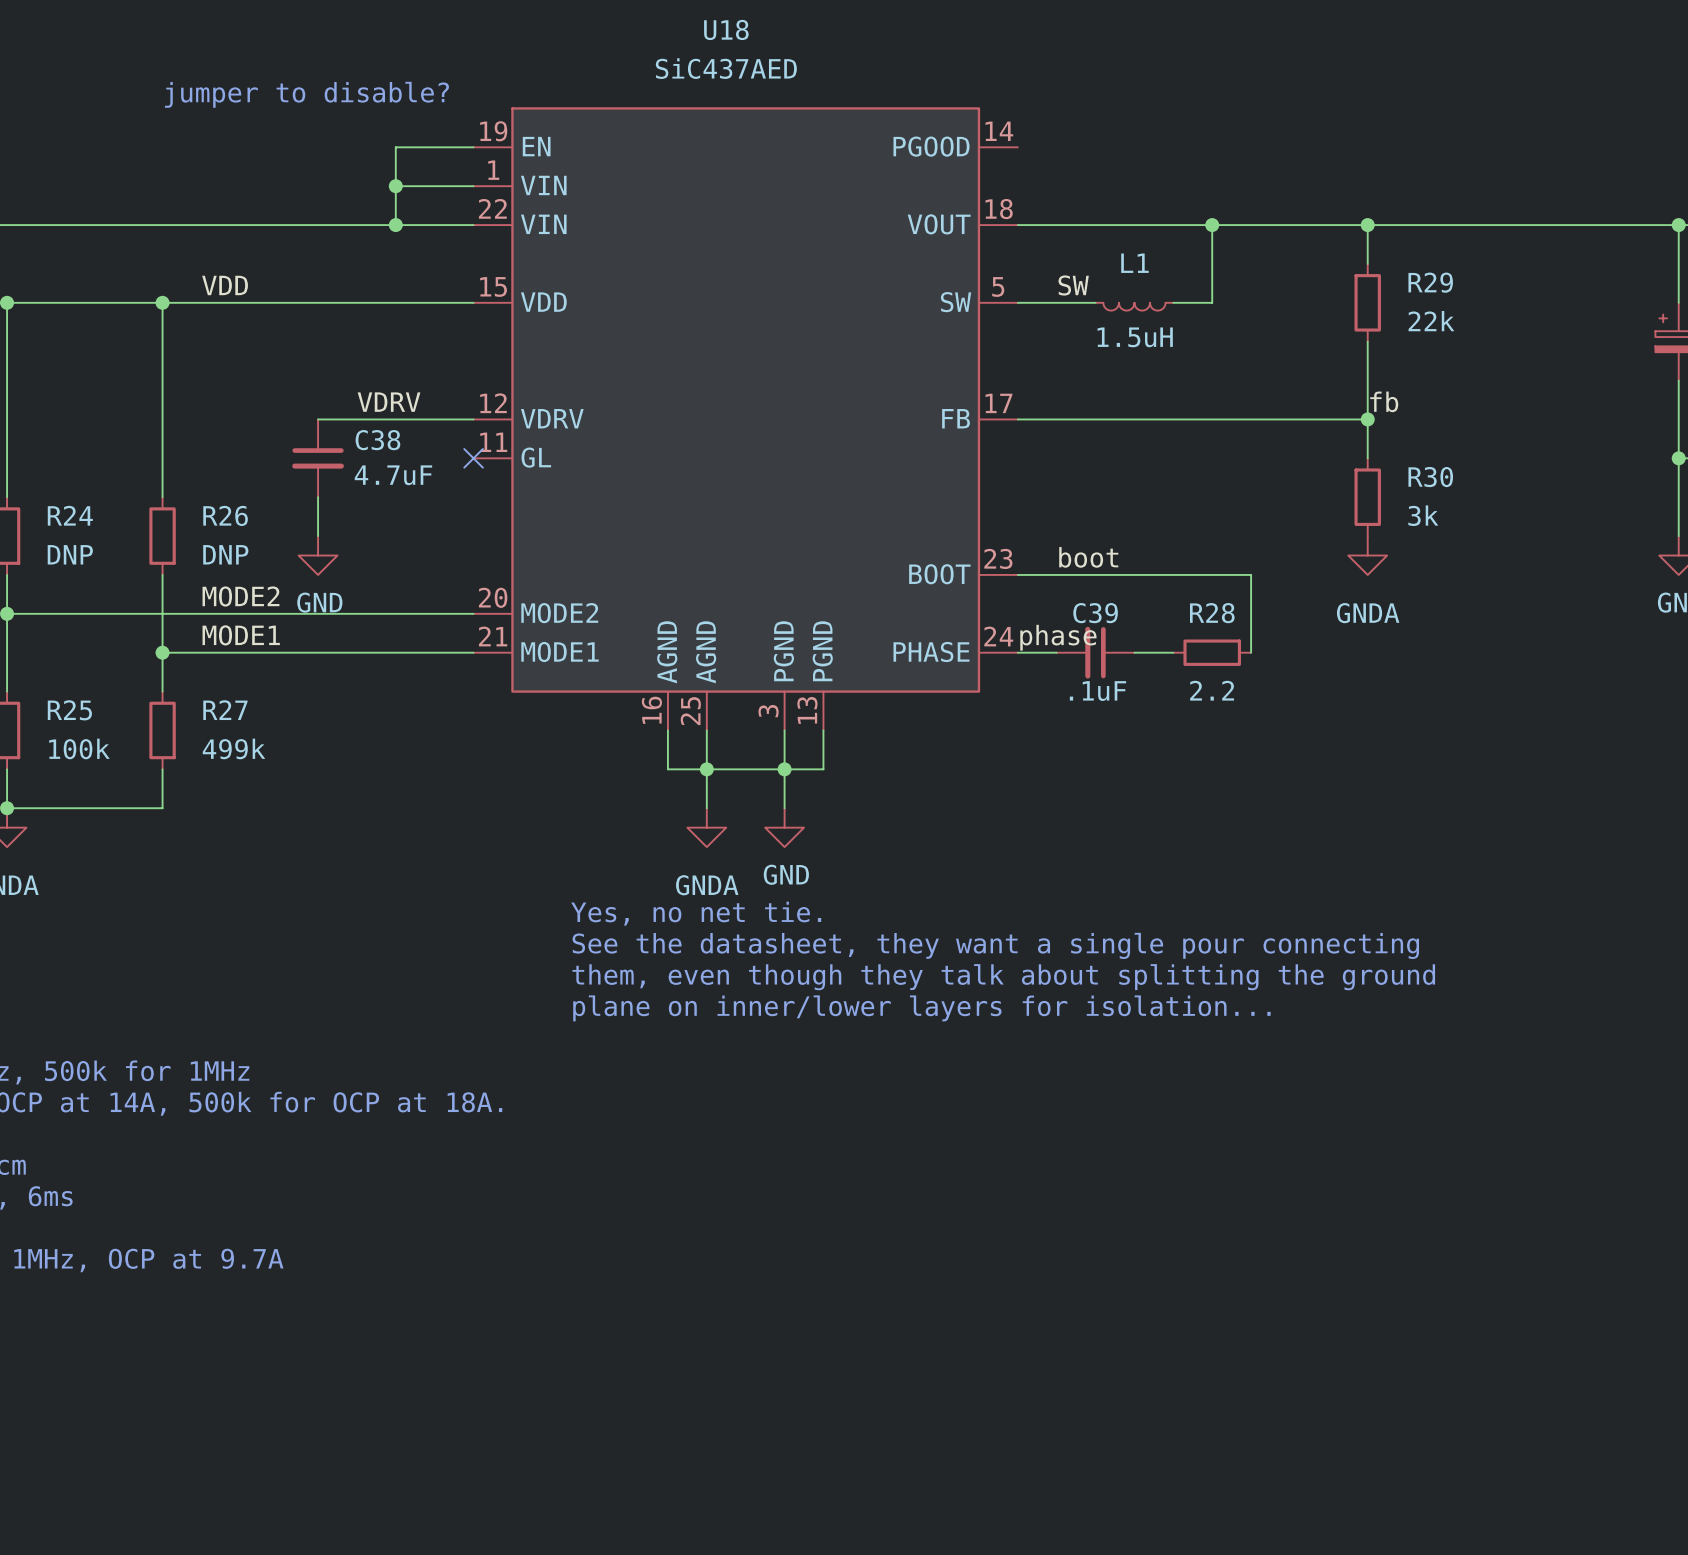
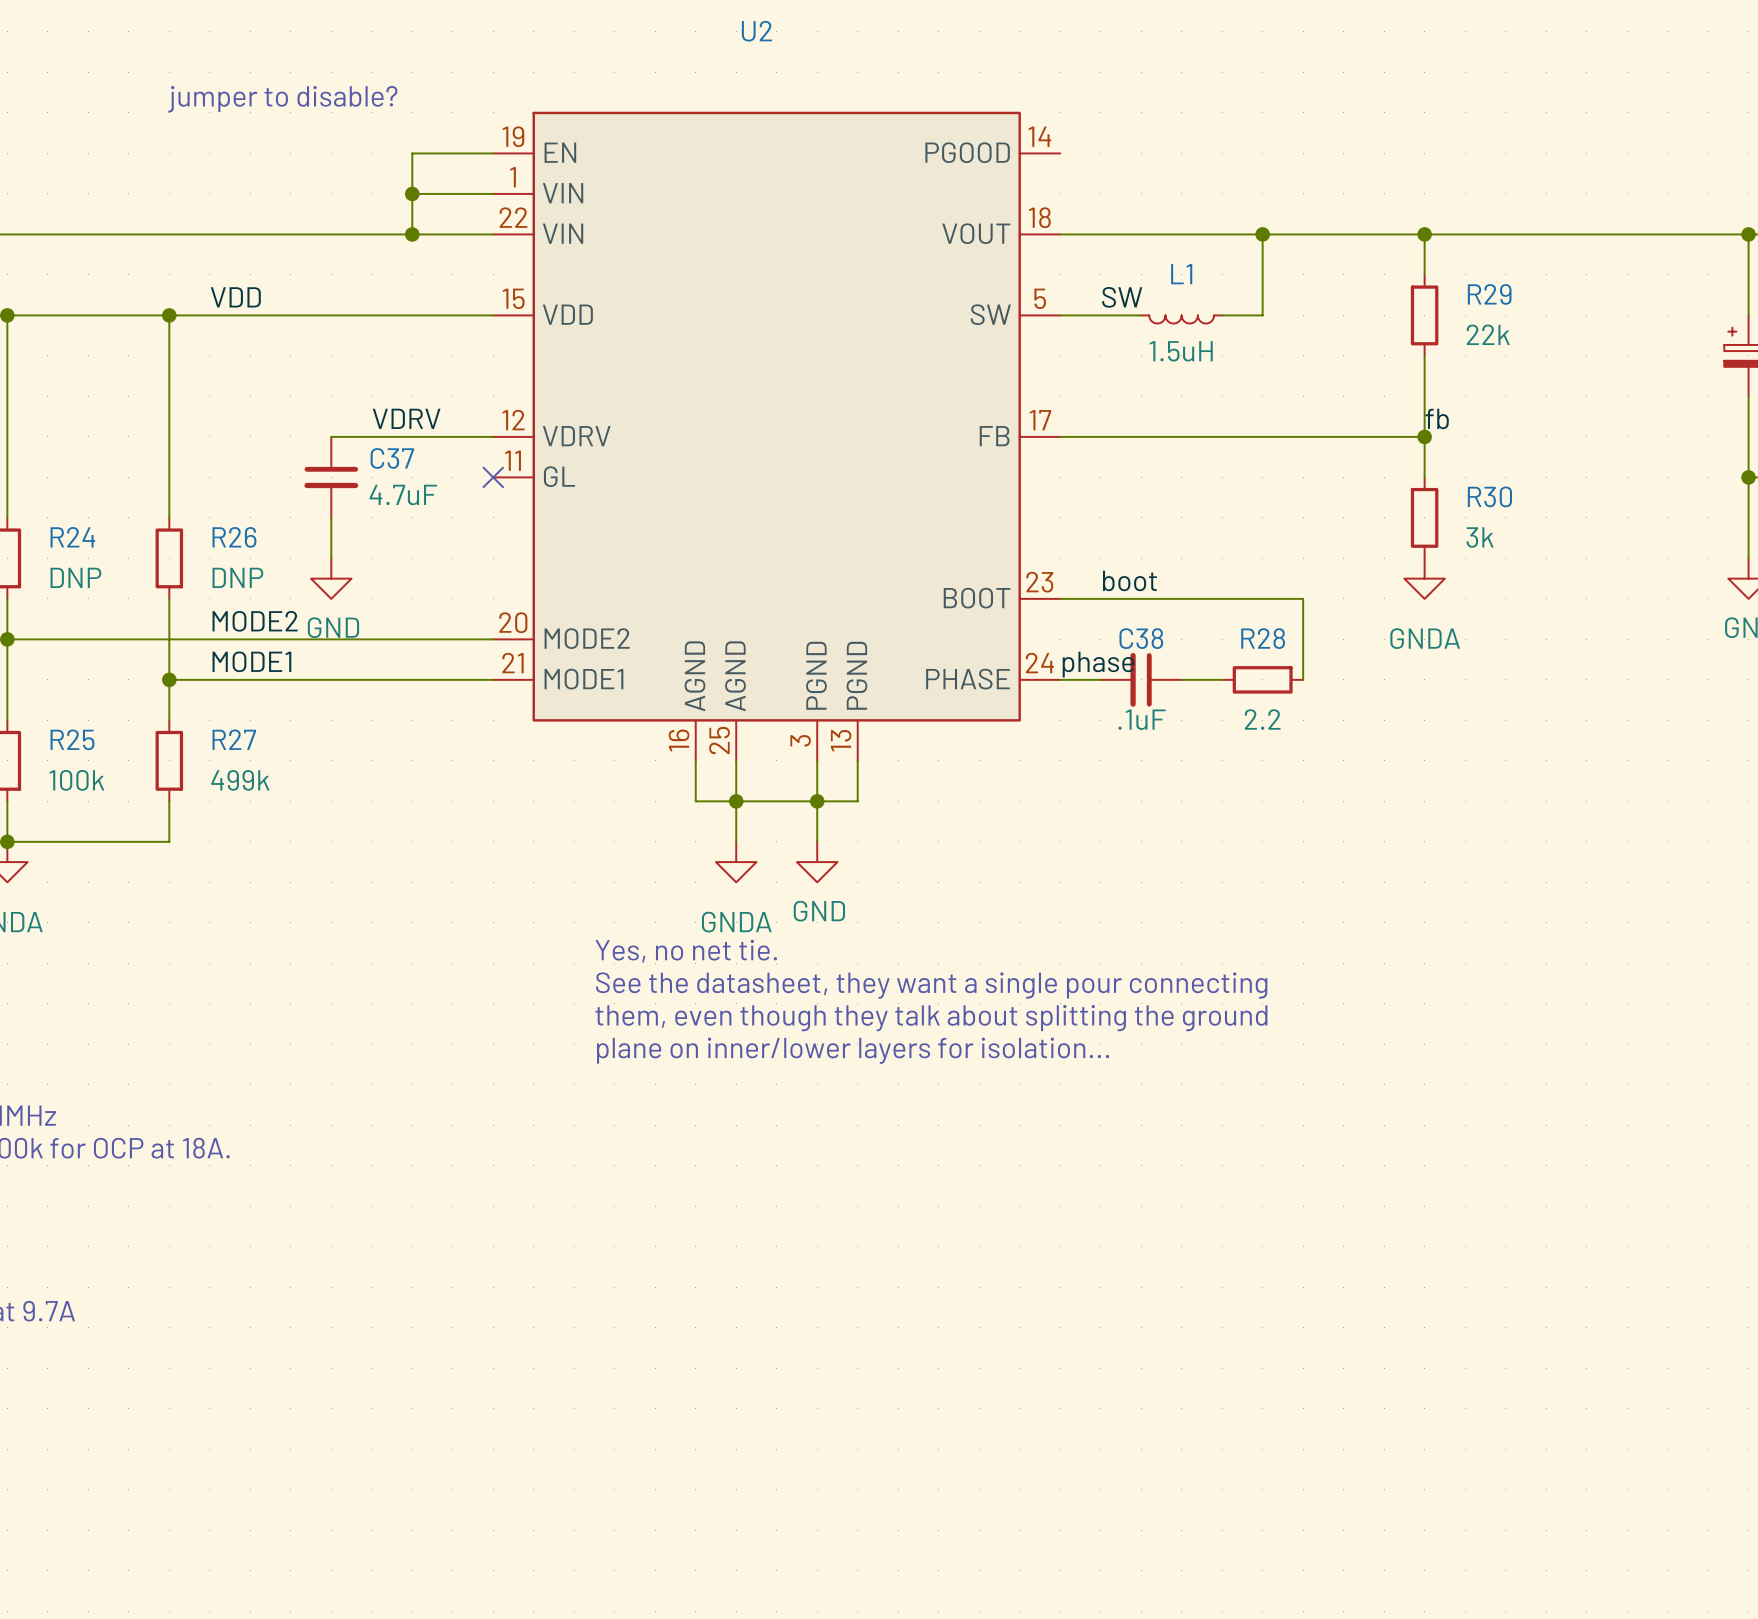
U18 name: U18 (726, 29) -> U2 (756, 31)
U18 value: SiC437AED (726, 68) -> none
C38 name: C38 (377, 440) -> C37 (392, 458)
C39 name: C39 (1095, 613) -> C38 (1141, 638)

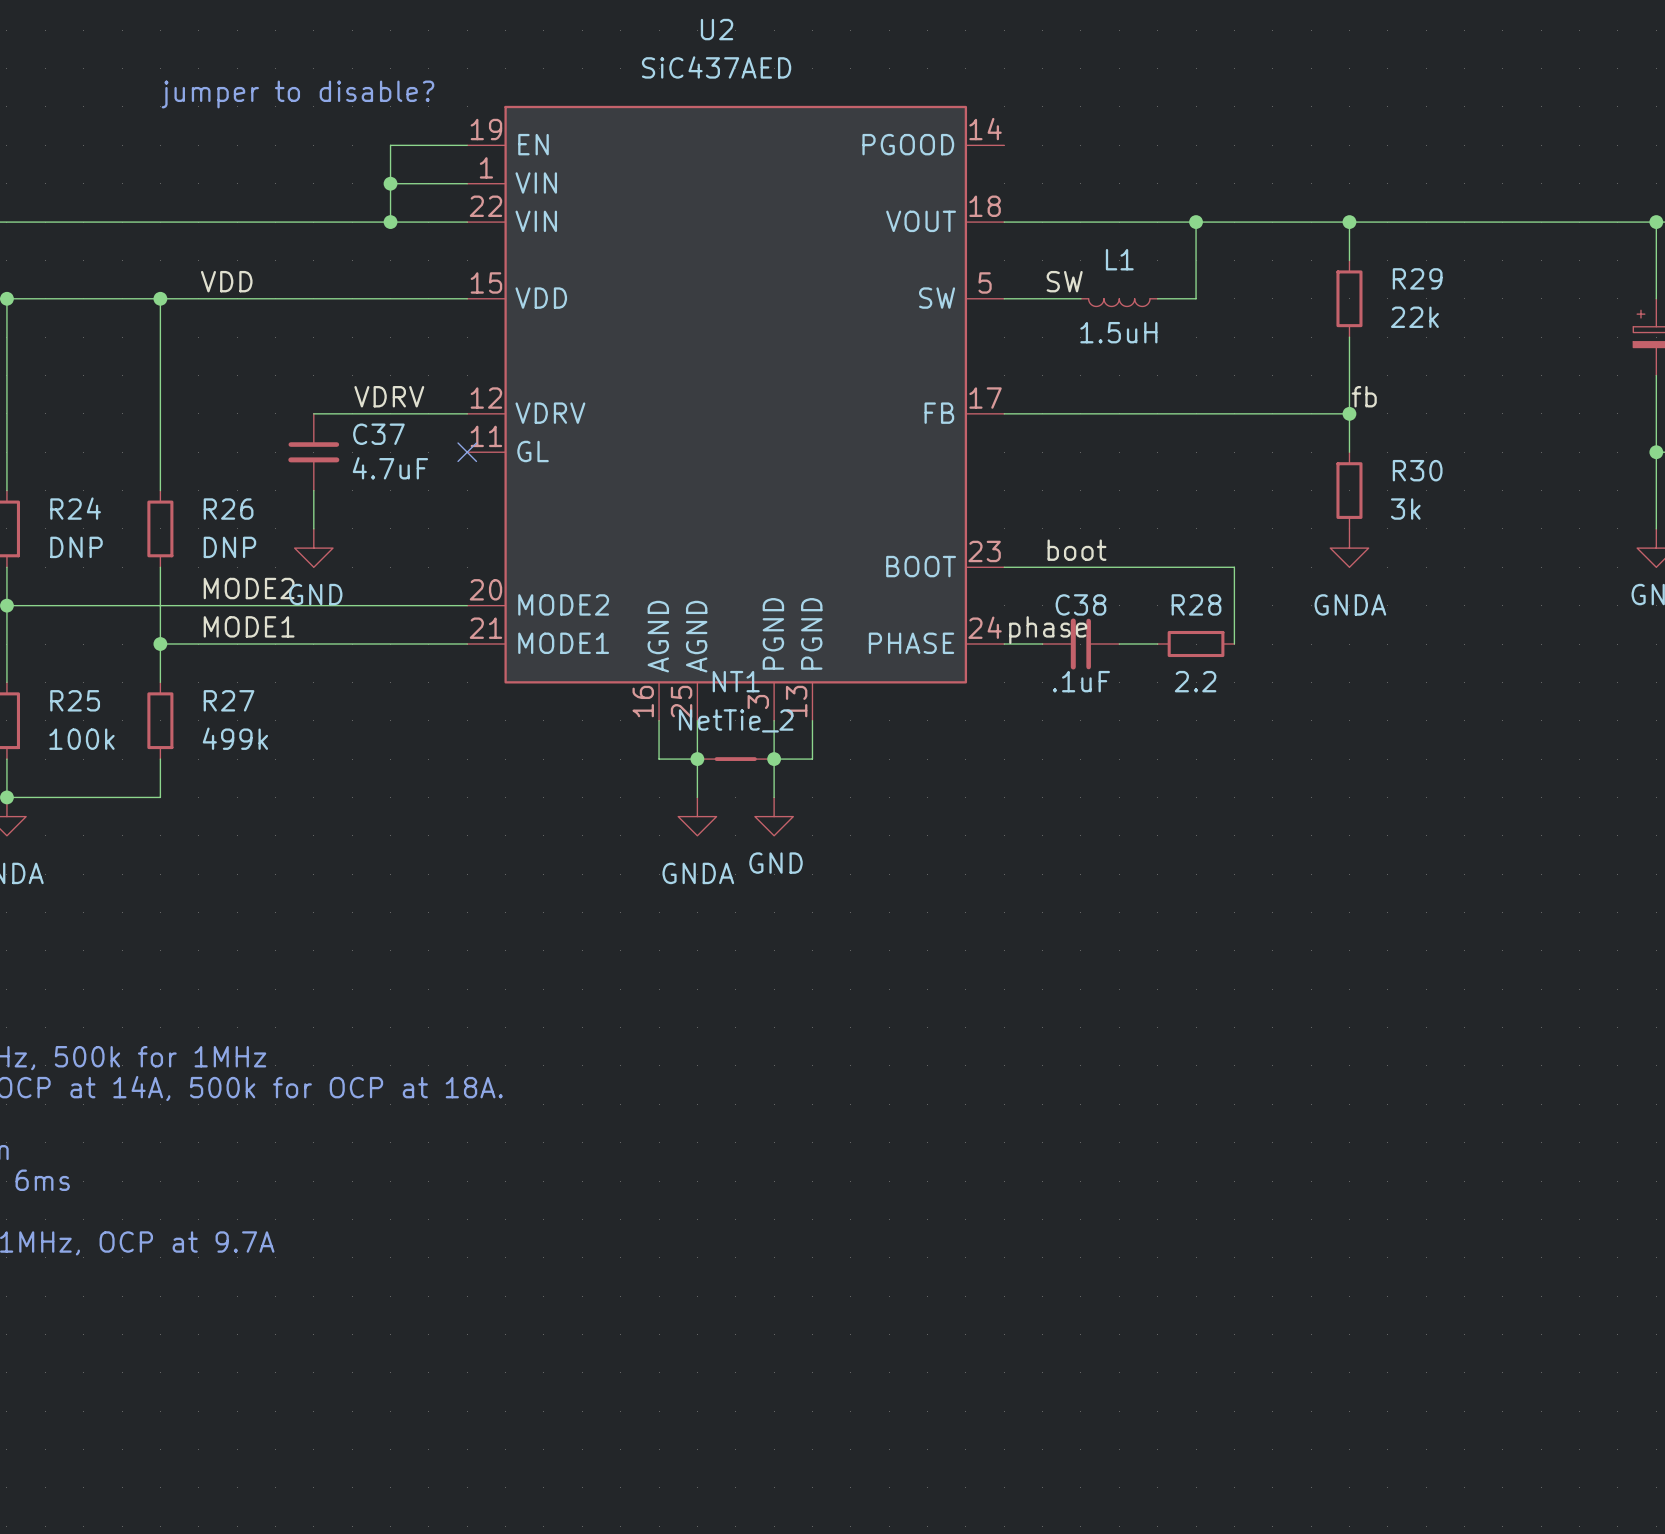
U2 value: none -> SiC437AED (716, 67)
NT1: none -> NetTie_2 (735, 759)
text: Yes, no net tie. (686, 951) -> none
text: See the datasheet, they want a single pour connecting (931, 985) -> none
text: them, even though they talk about splitting the ground (931, 1018) -> none
text: plane on inner/lower layers for isolation... (853, 1050) -> none

